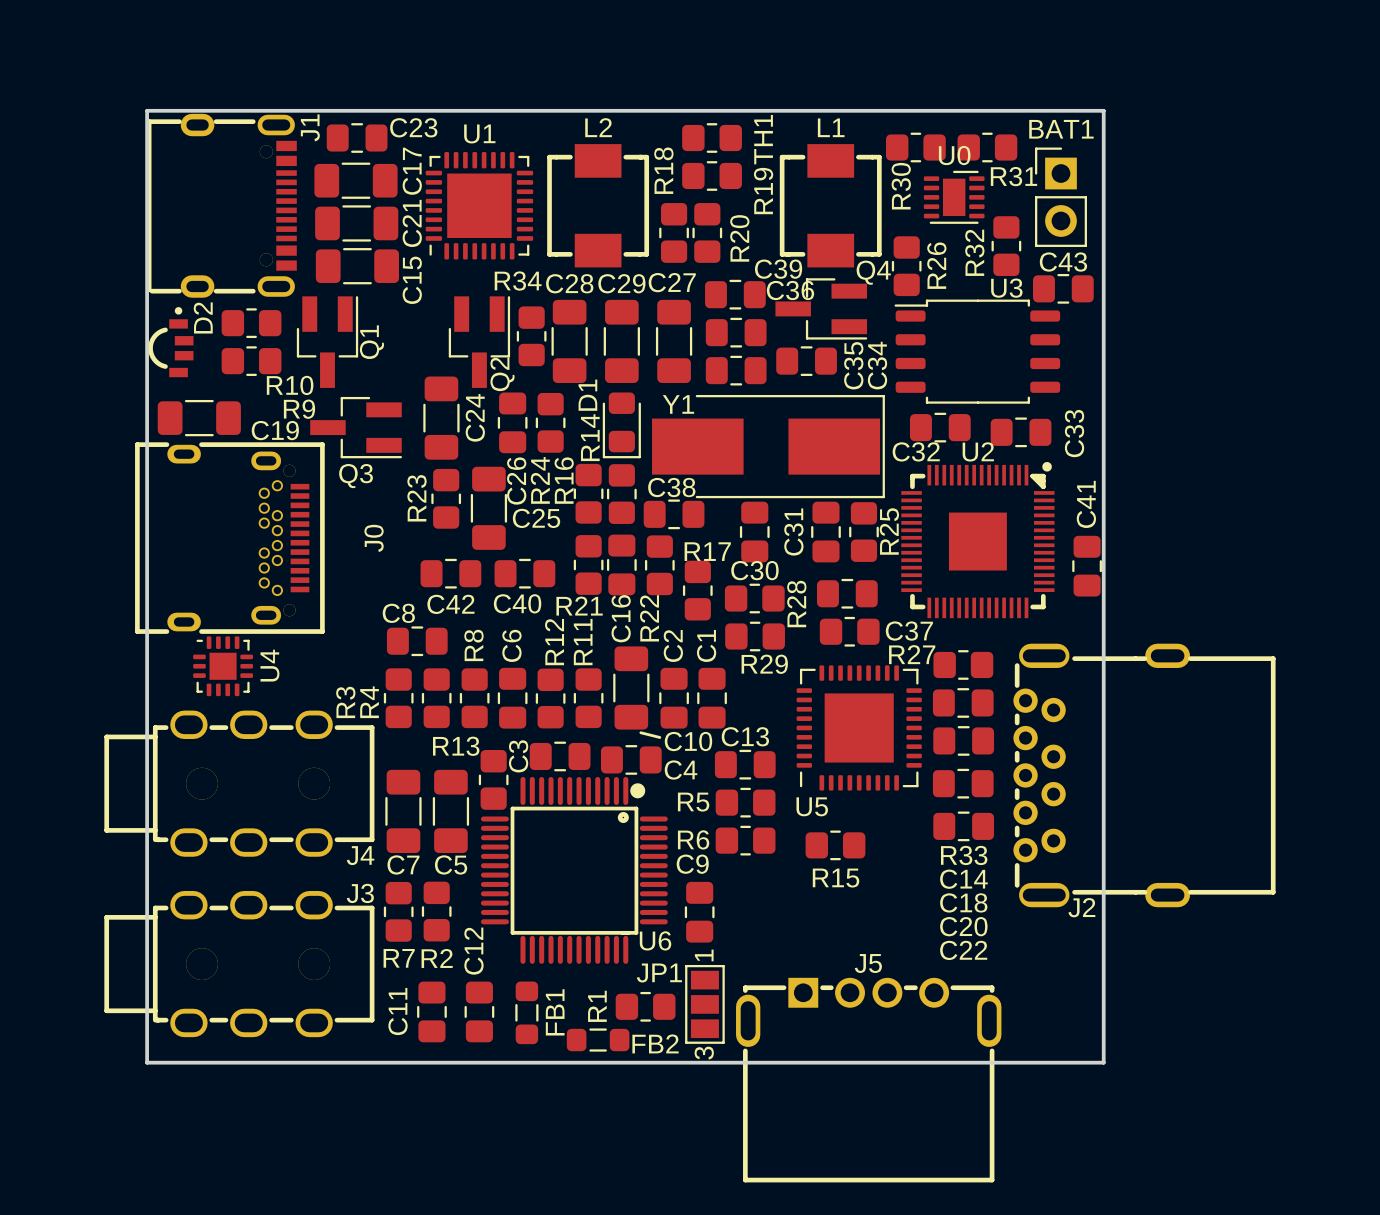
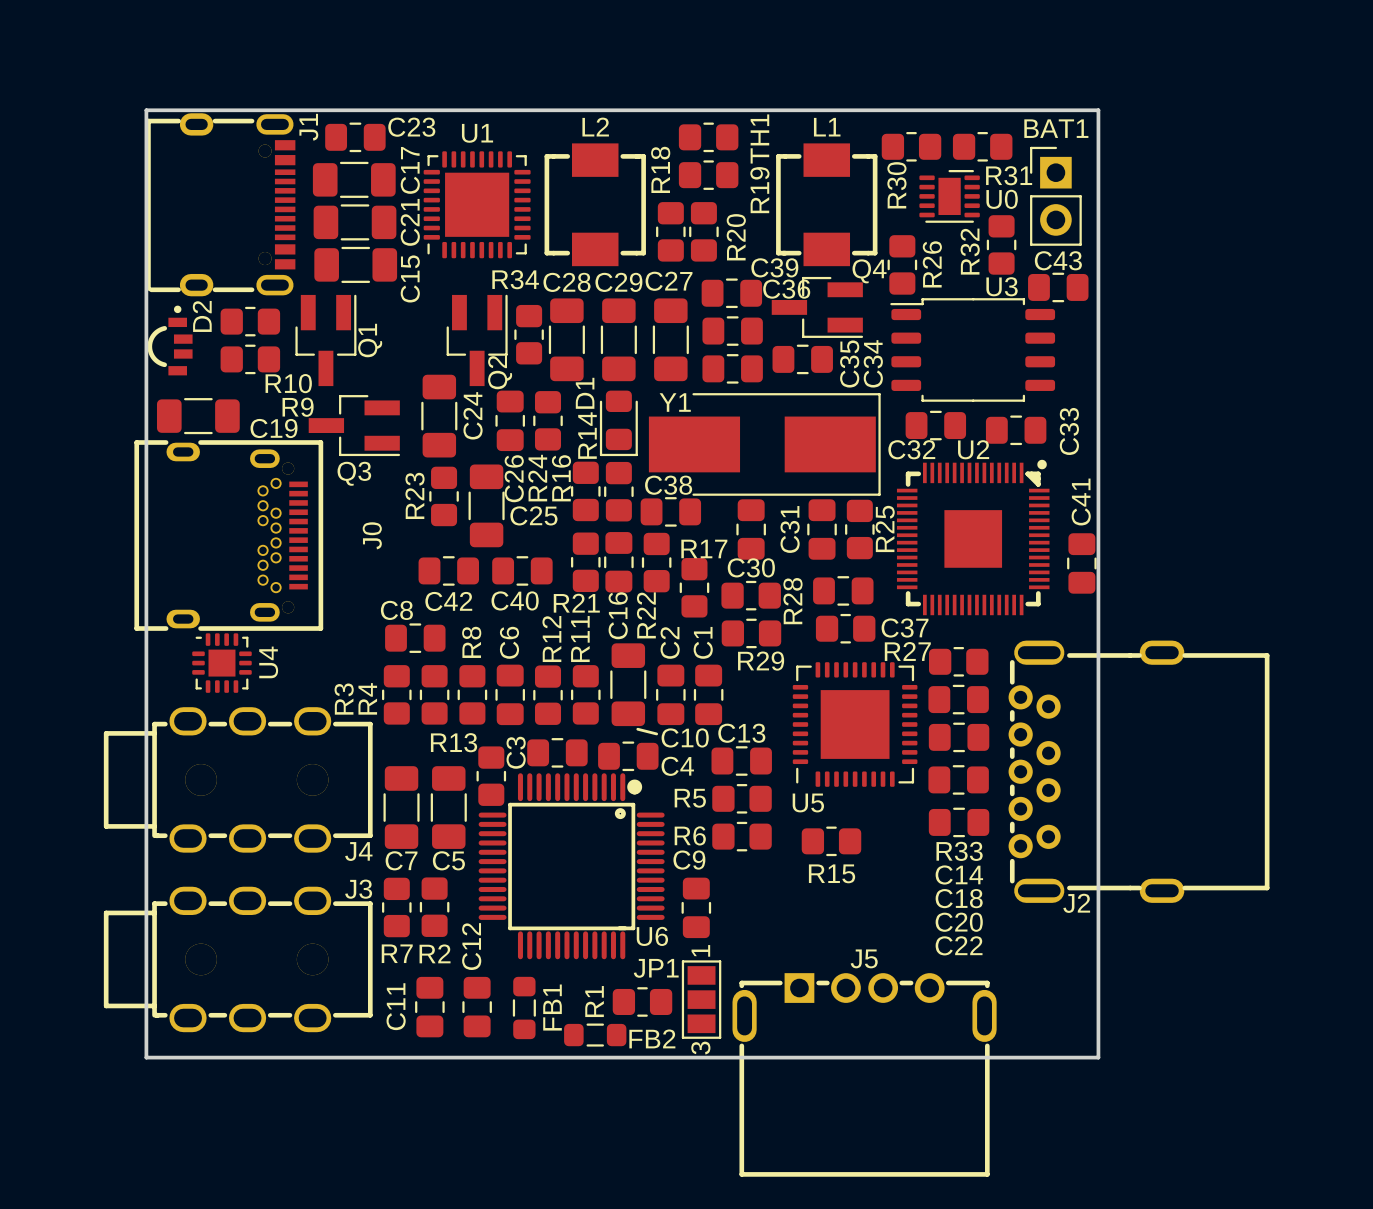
U0 name position: U0 (954, 155) -> U0 (1002, 199)

